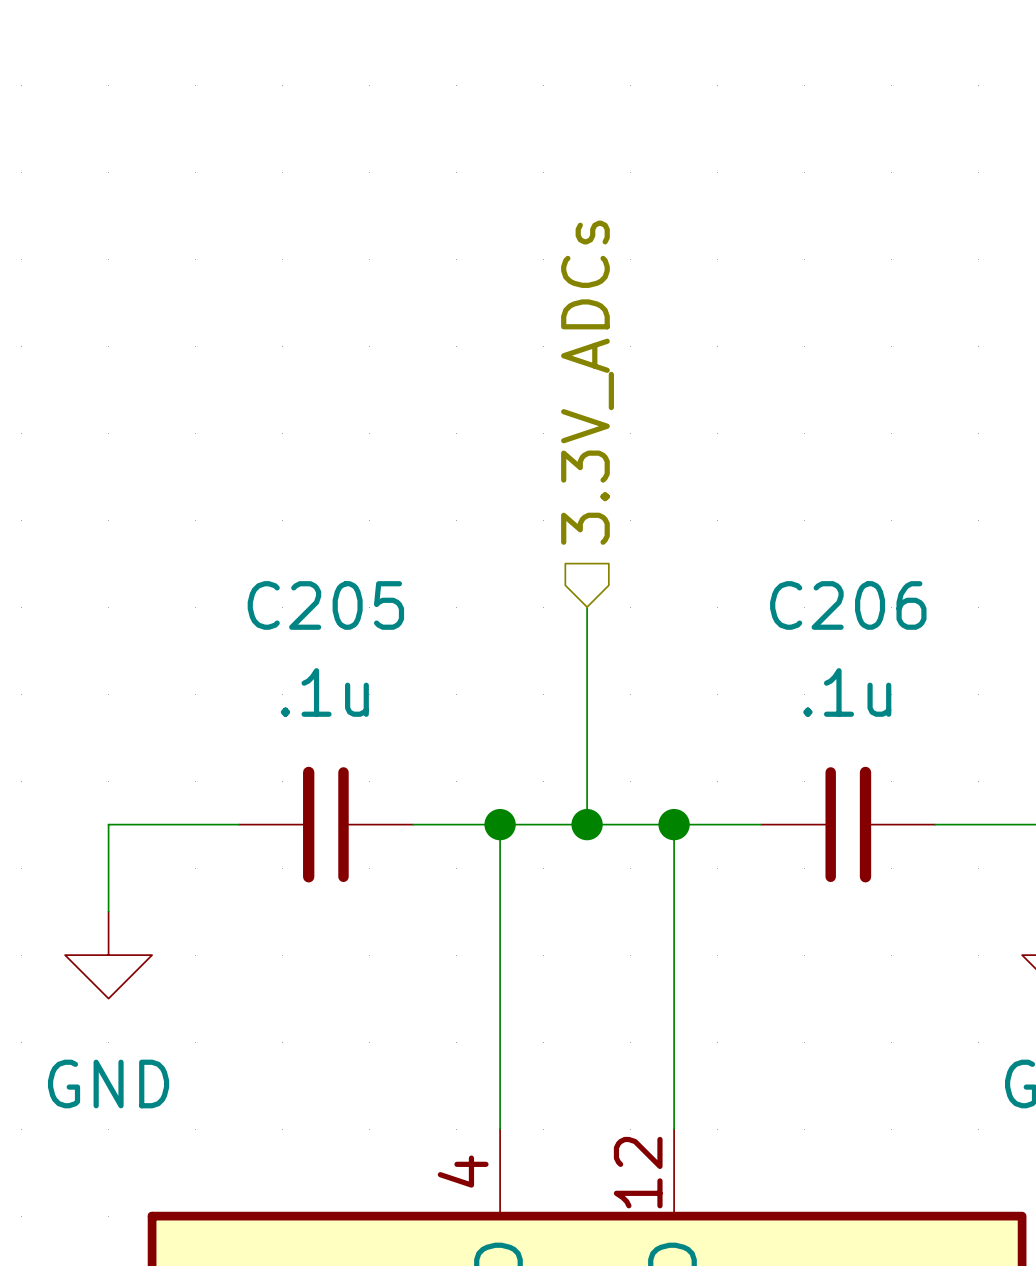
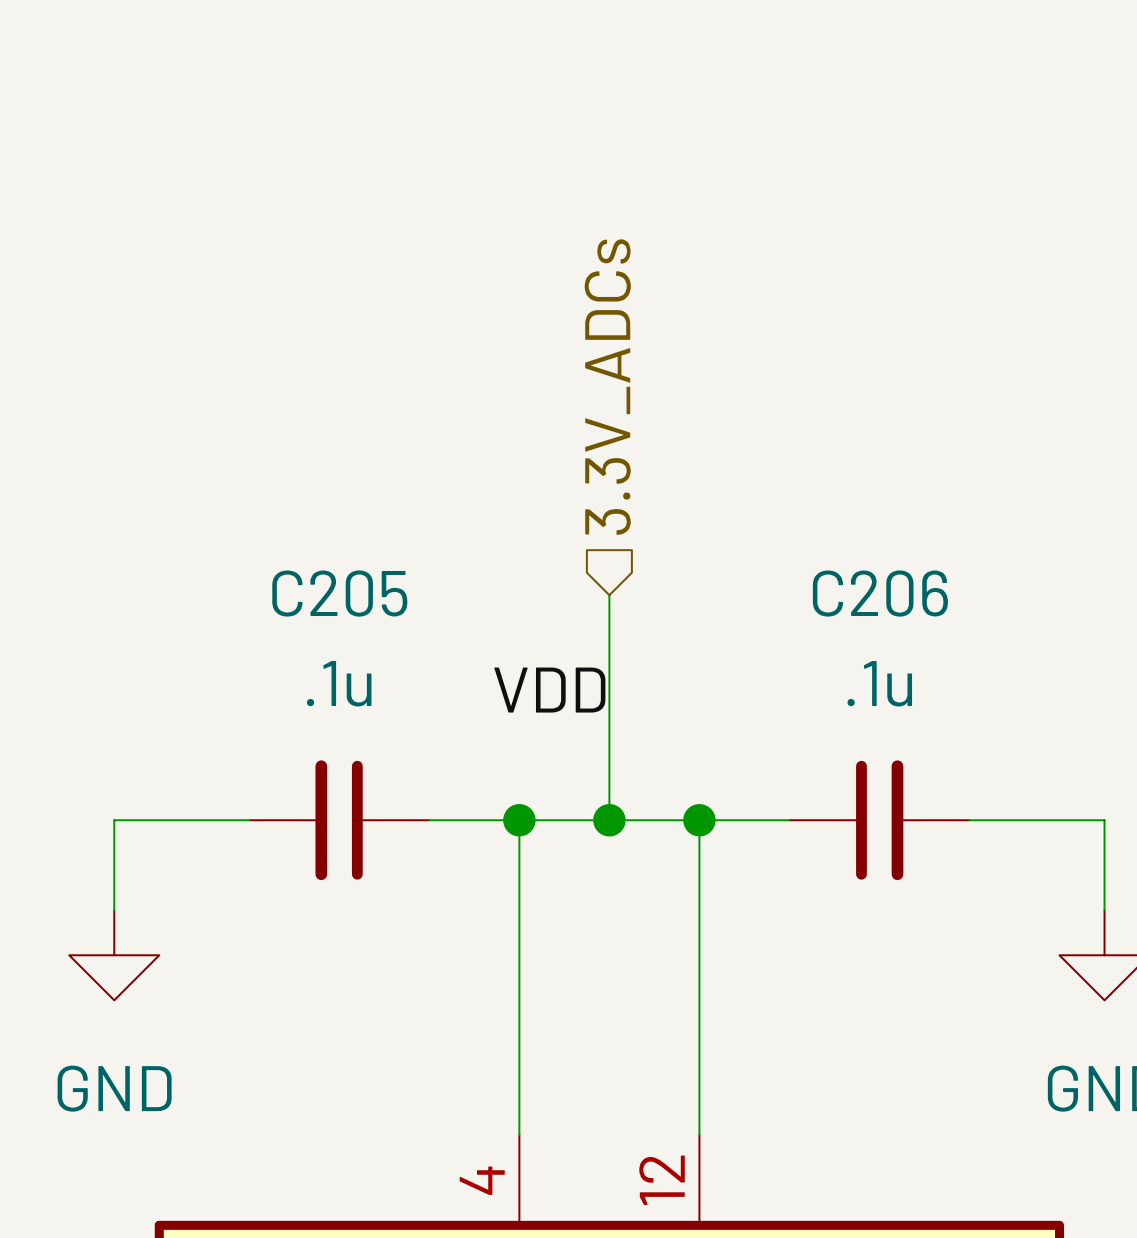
label: none -> VDD (549, 690)

